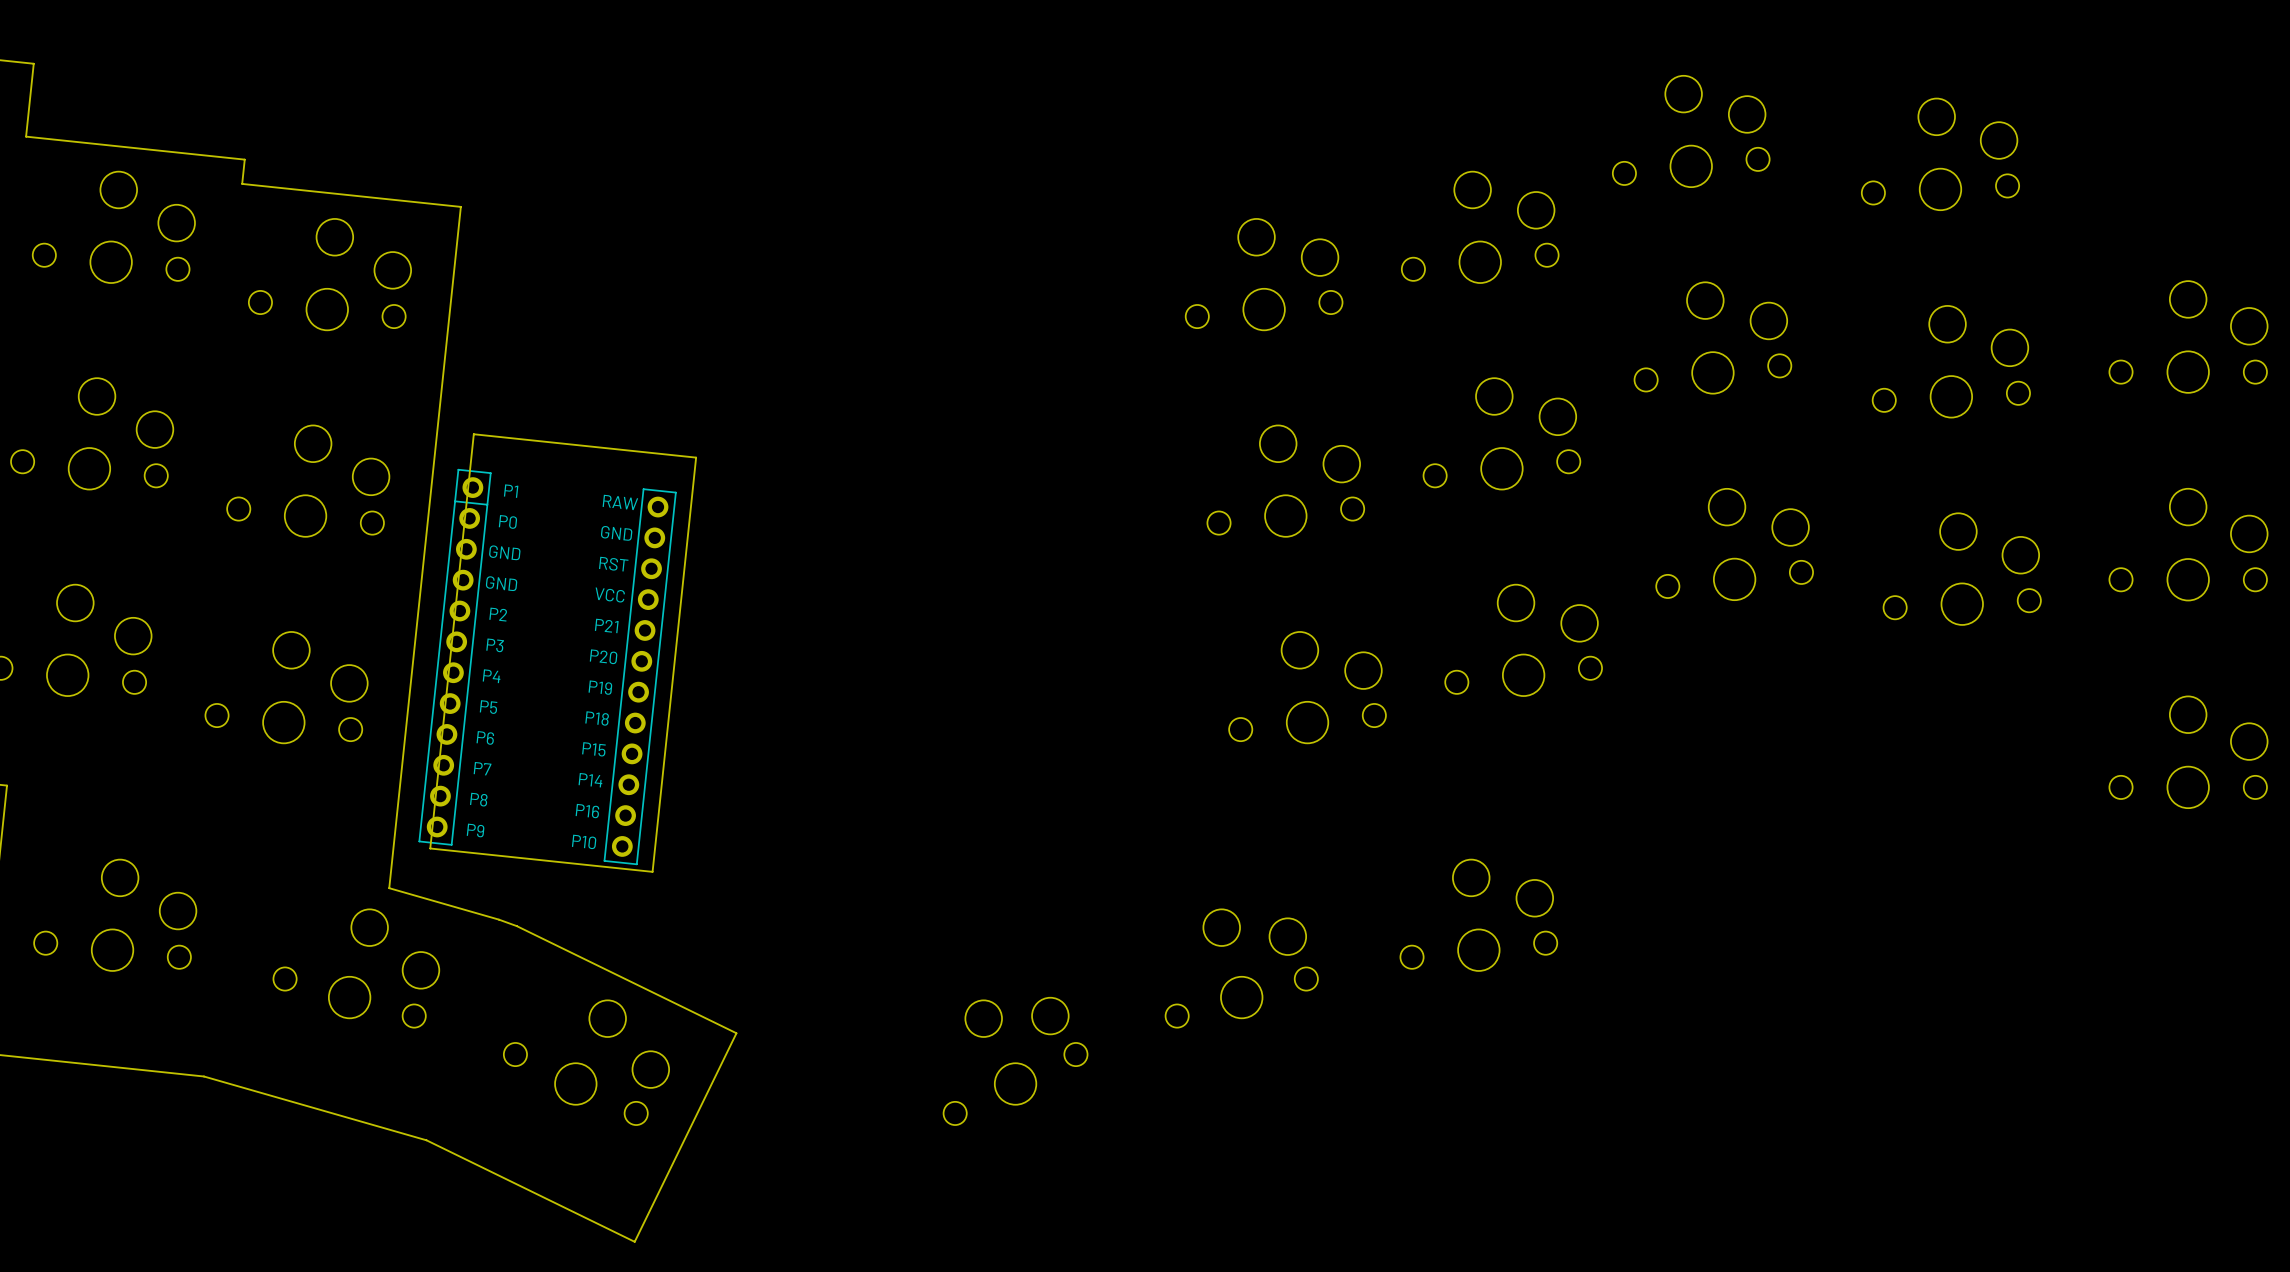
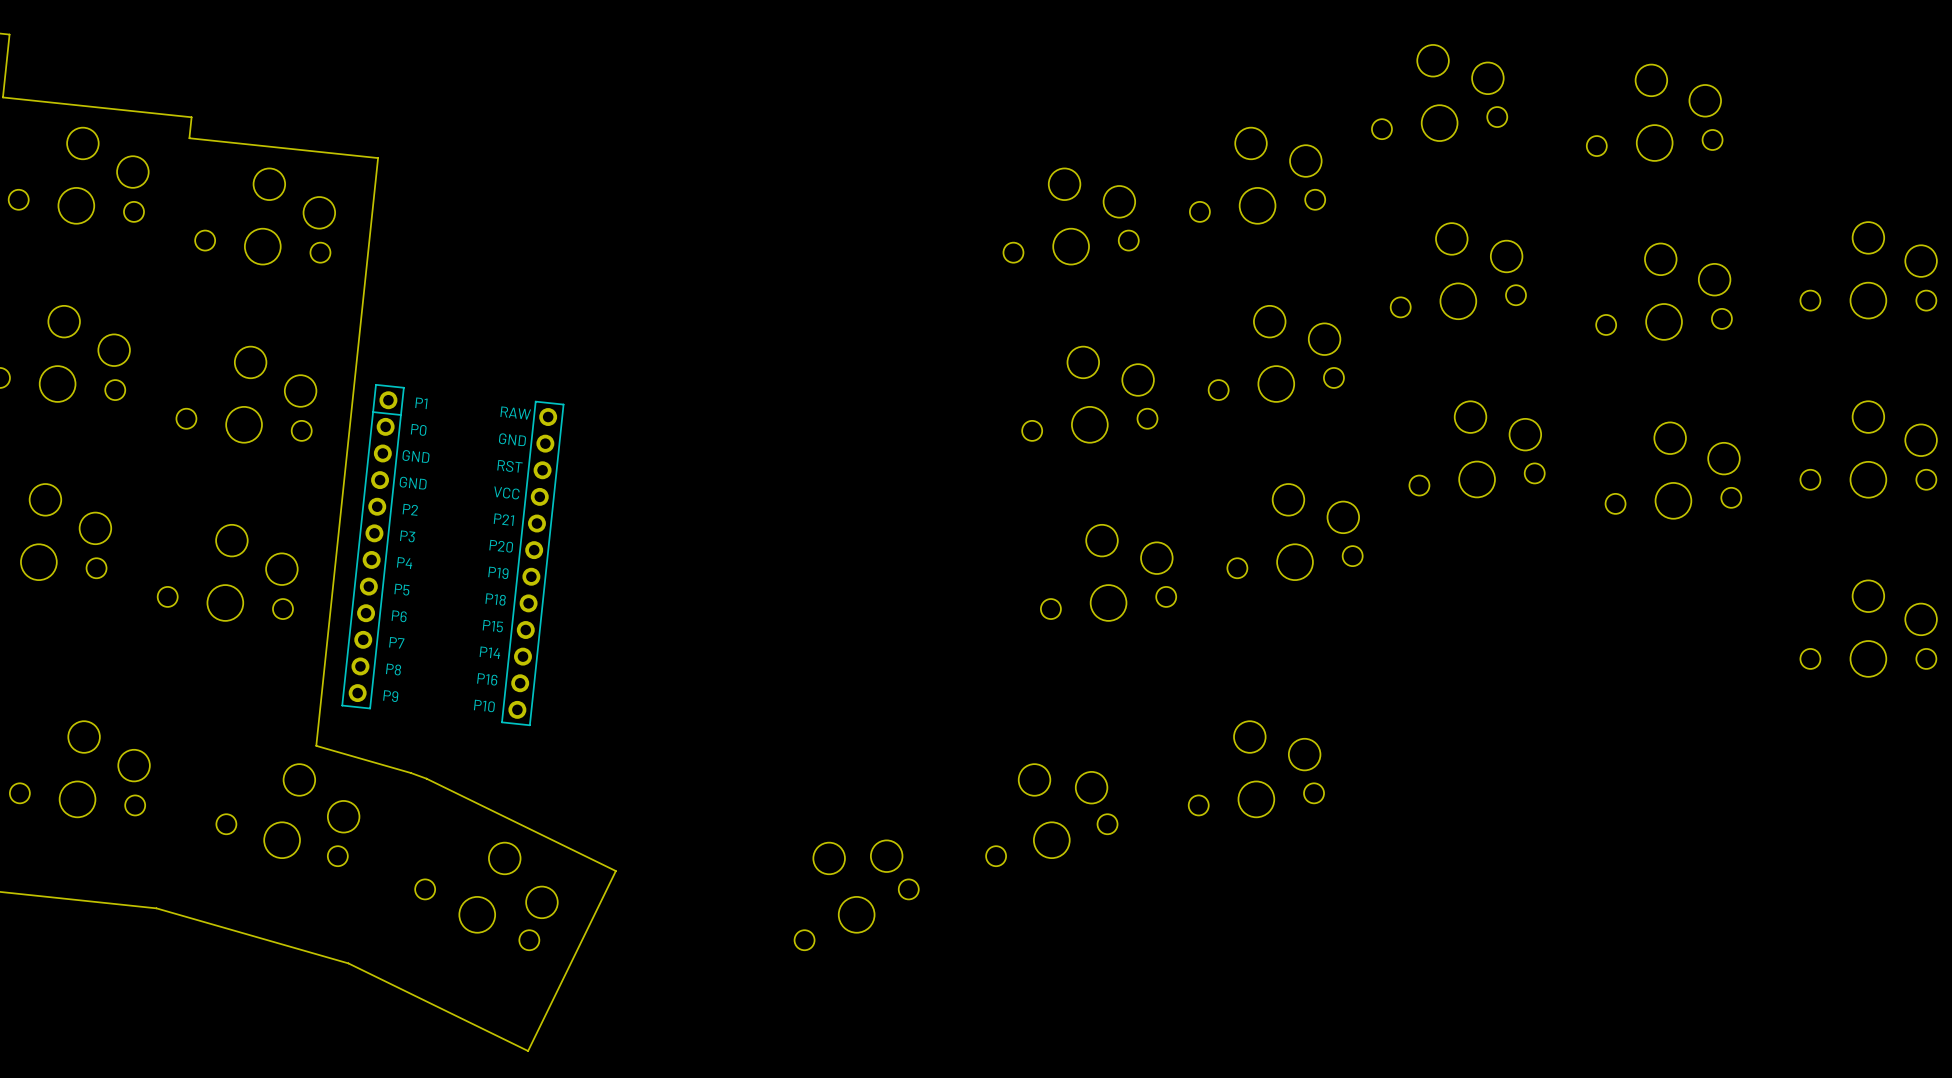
board edge: (473, 434) (430, 848) (652, 871) (696, 457) (473, 434) -> none

